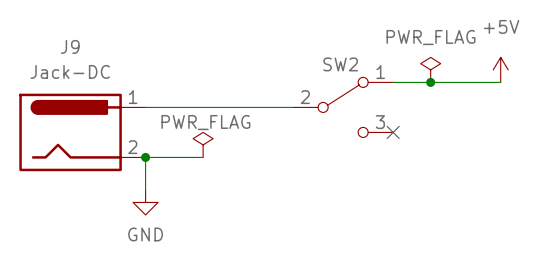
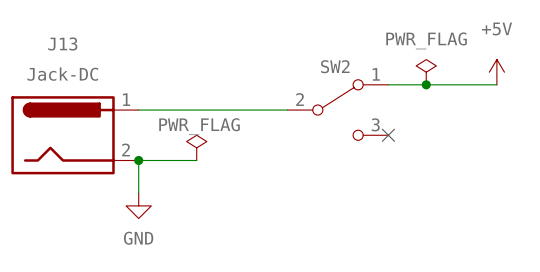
J9 name: J9 (70, 46) -> J13 (62, 44)

